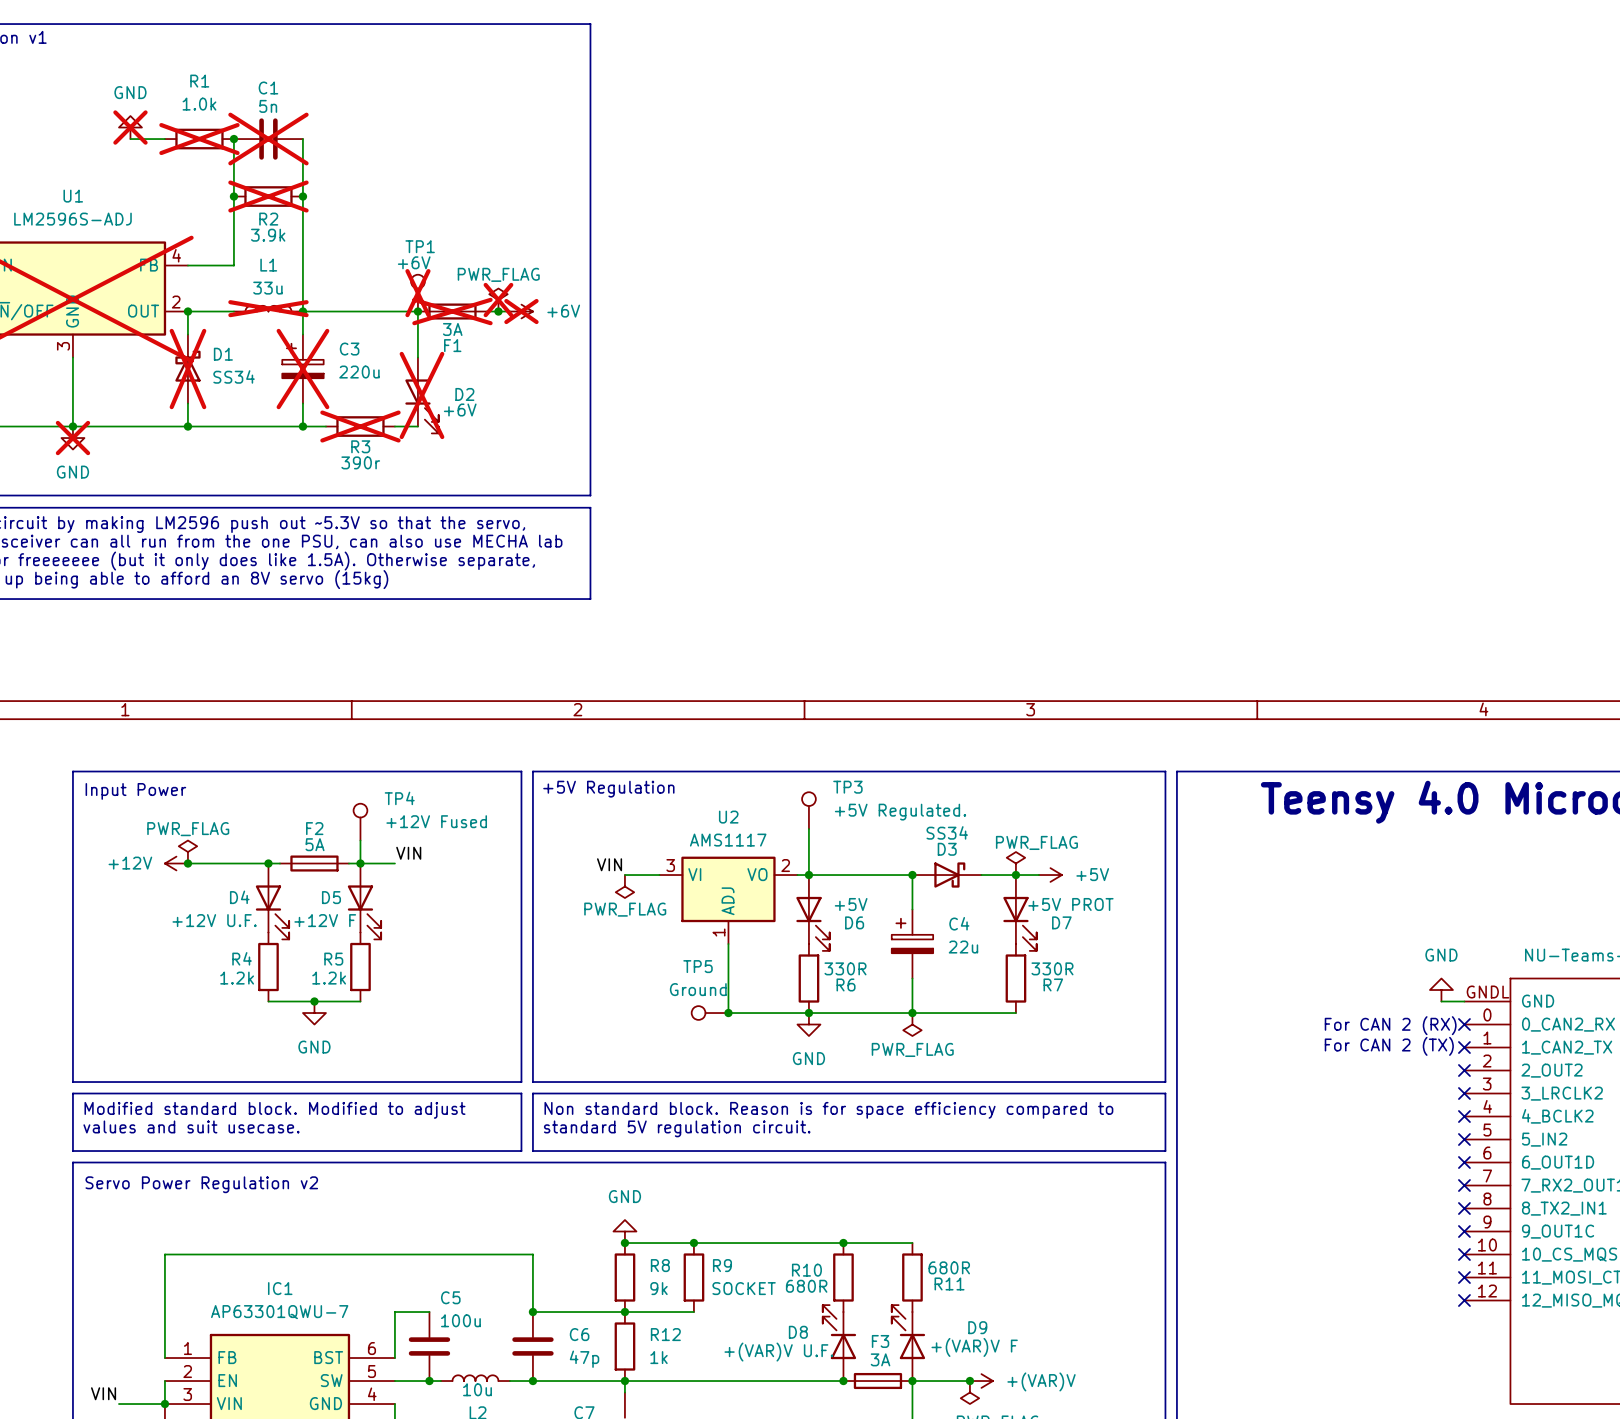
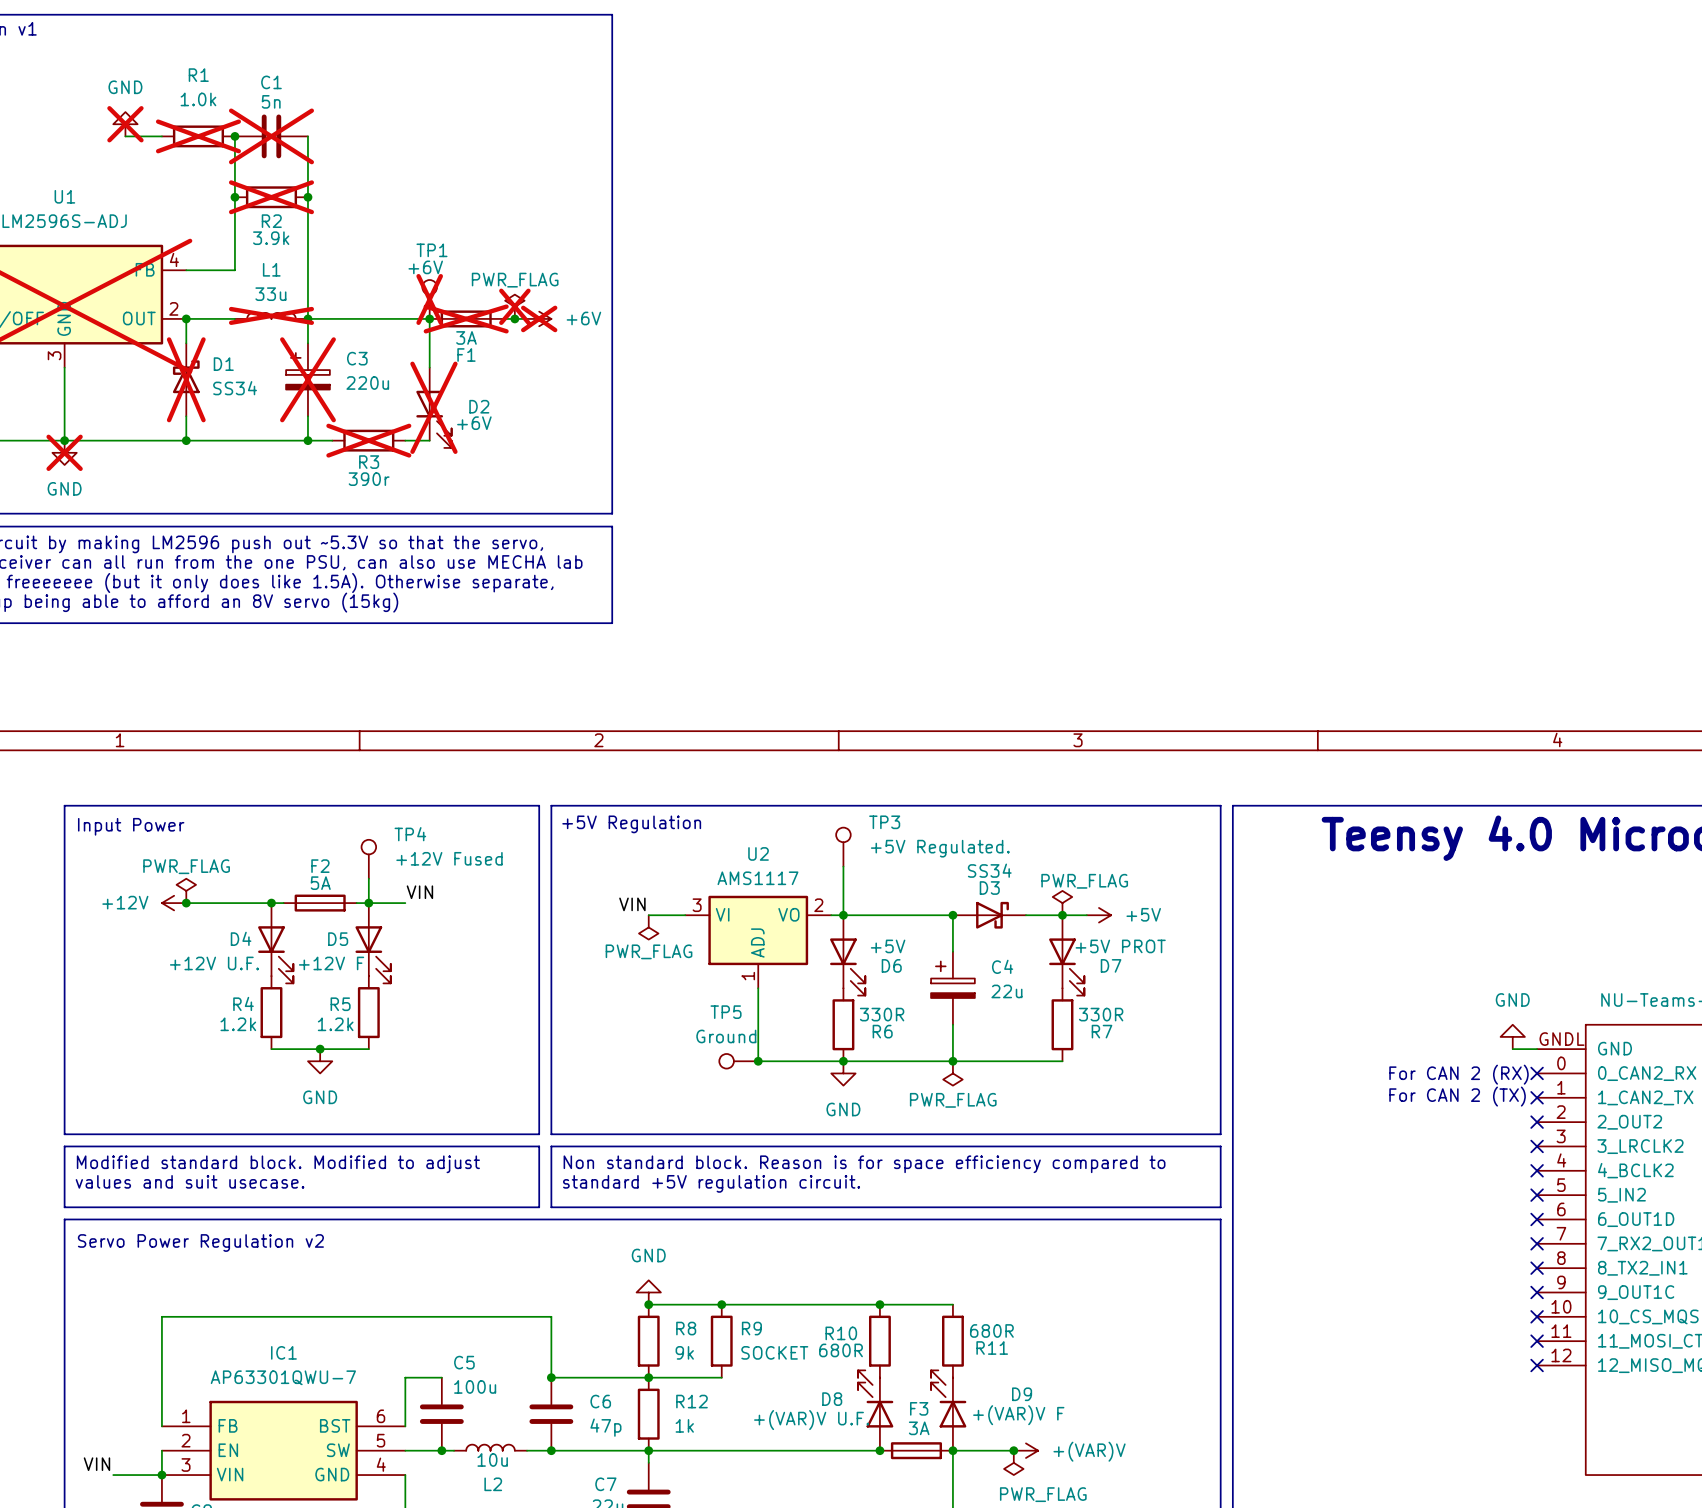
text: standard 5V regulation circuit. (677, 1128) -> standard +5V regulation circuit. (711, 1183)

